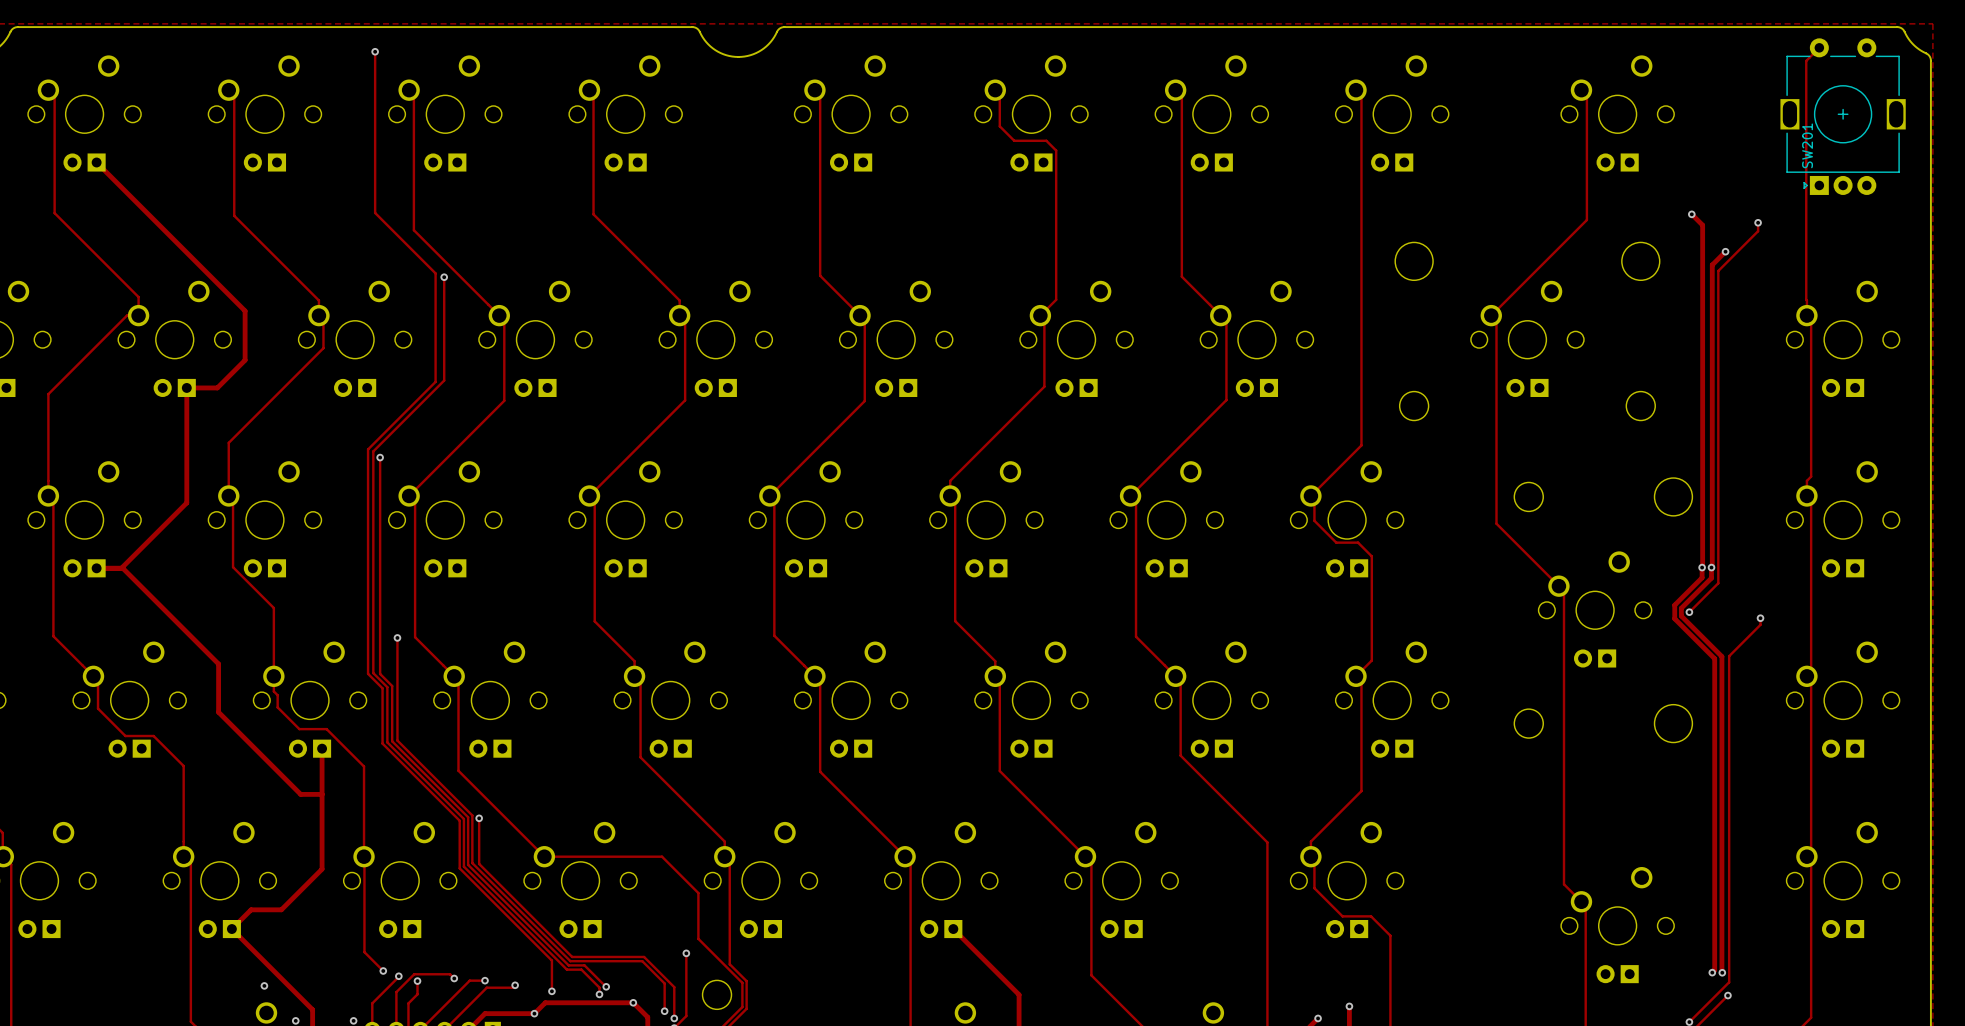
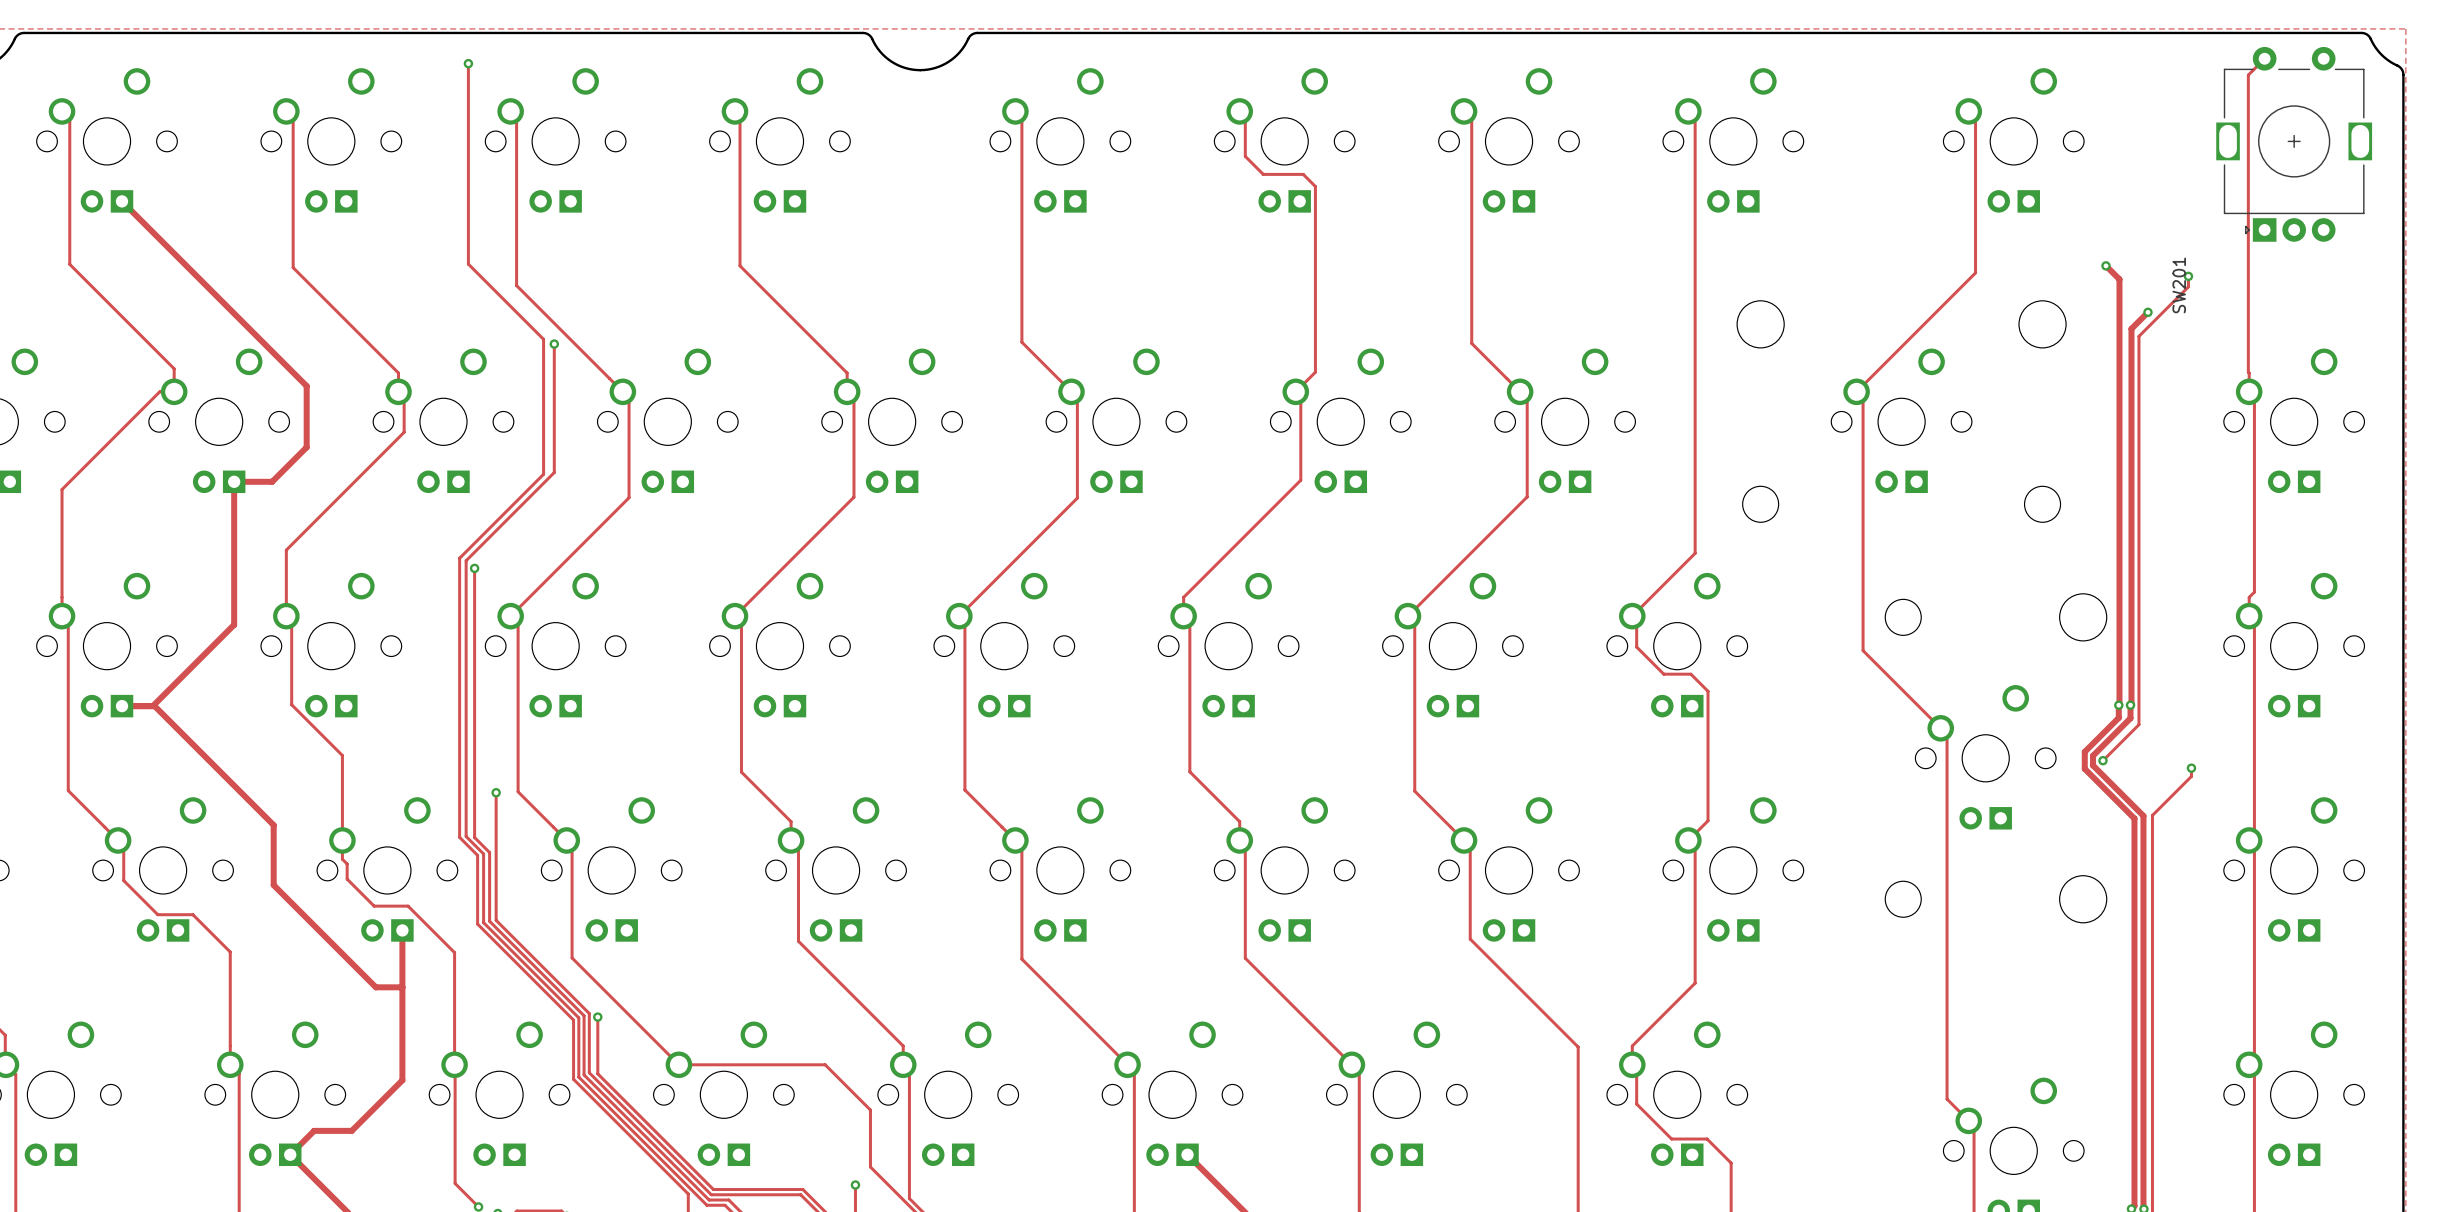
SW201 name position: SW201 (1807, 145) -> SW201 (2179, 285)

